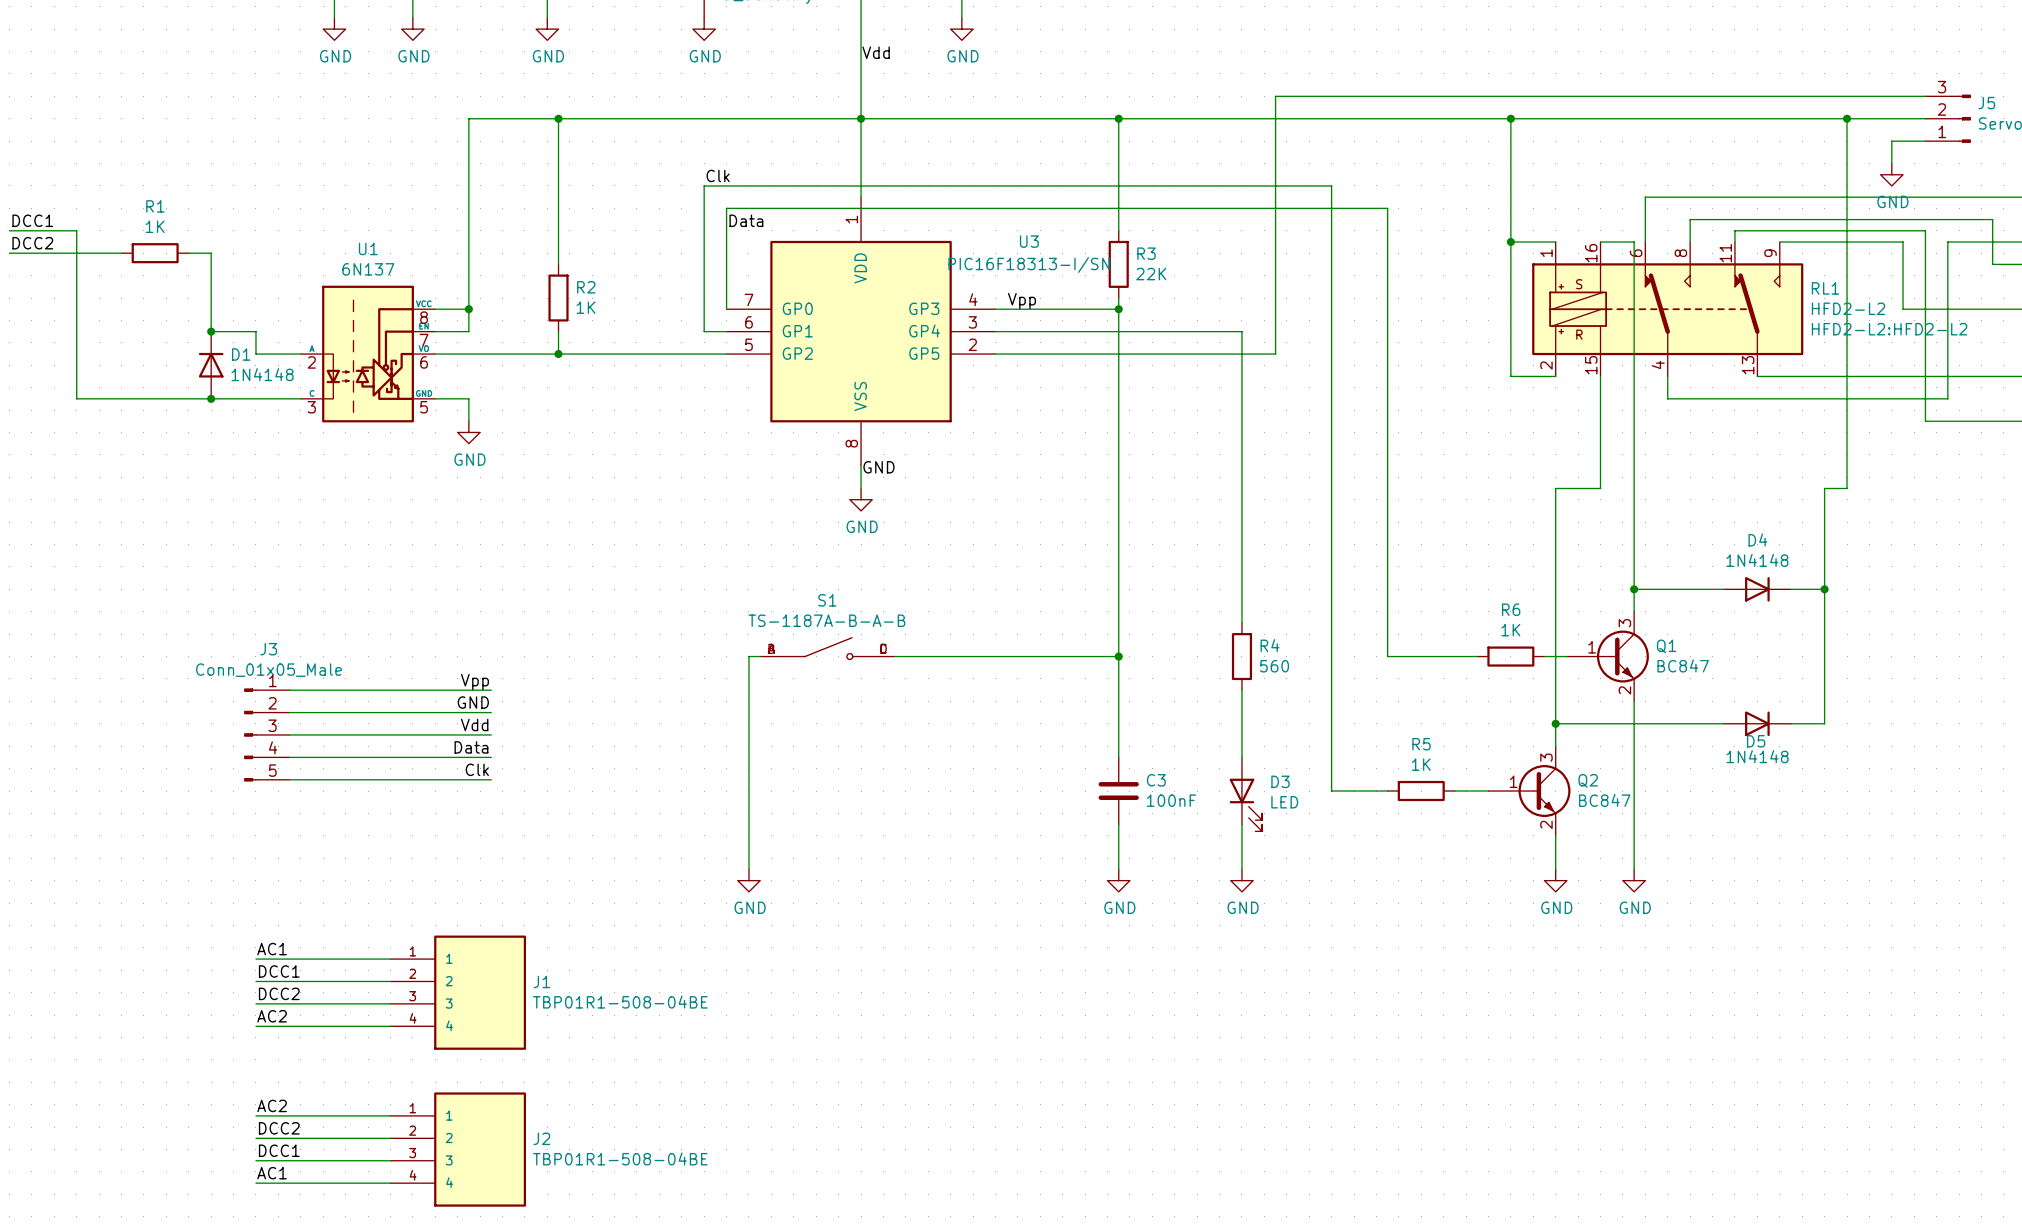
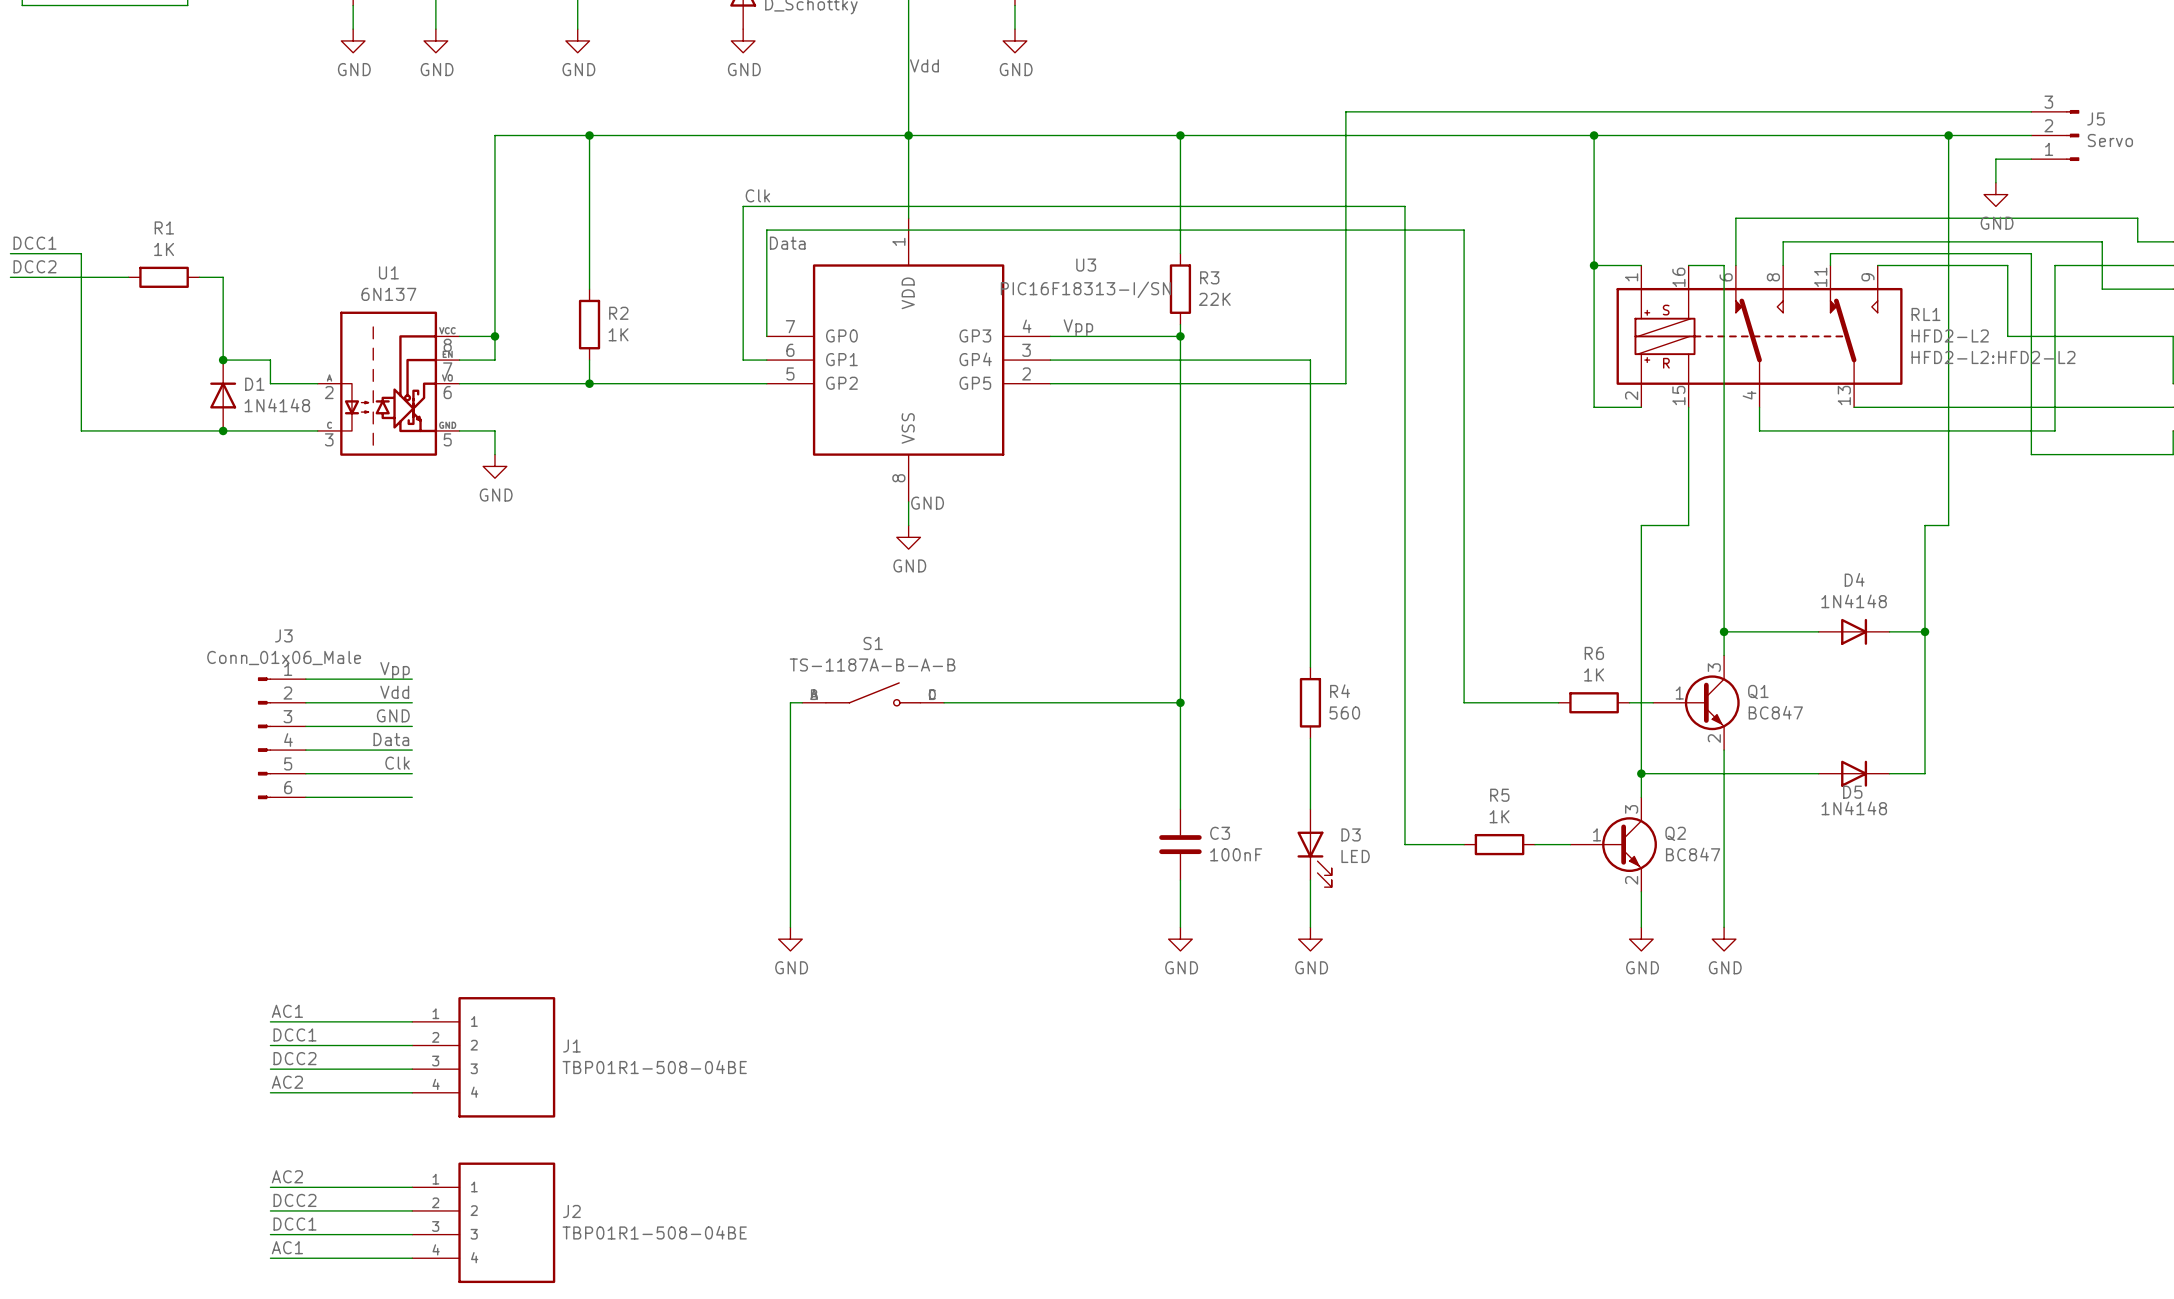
wire: none -> (305, 679) (412, 679)
wire: none -> (305, 702) (412, 702)
J3 value: Conn_01x05_Male (268, 670) -> Conn_01x06_Male (284, 657)
wire: none -> (305, 726) (412, 726)
label position: Vpp (474, 682) -> Vpp (395, 670)
J3 symbol: [244, 688, 290, 782] -> [257, 677, 306, 800]
wire: (289, 690) (491, 690) -> none
wire: none -> (305, 750) (412, 750)
label position: GND (473, 702) -> GND (393, 715)
wire: (289, 712) (491, 712) -> none
wire: none -> (305, 773) (412, 773)
label position: Vdd (474, 724) -> Vdd (394, 692)
wire: (289, 734) (491, 734) -> none
wire: none -> (305, 797) (412, 797)
label position: Data (471, 747) -> Data (391, 739)
wire: (289, 757) (491, 757) -> none
label position: Clk (477, 769) -> Clk (397, 763)
wire: (289, 779) (491, 779) -> none

